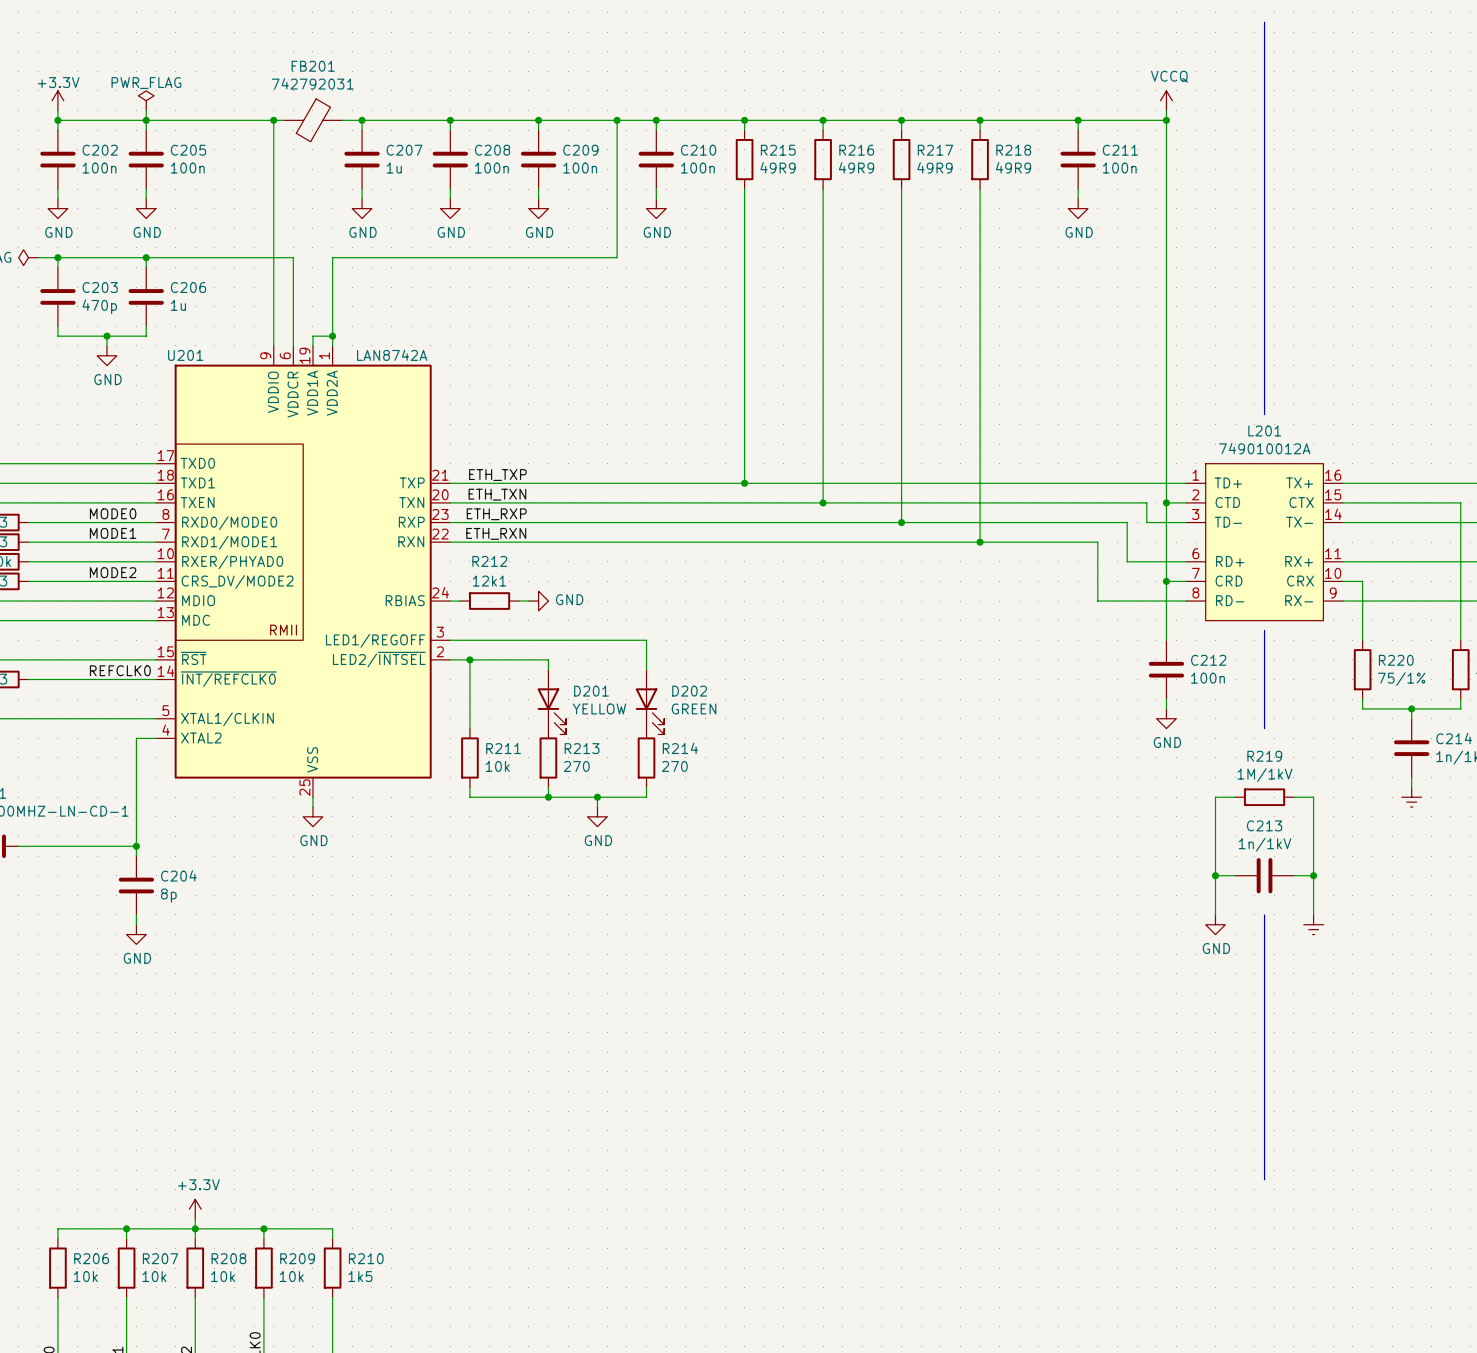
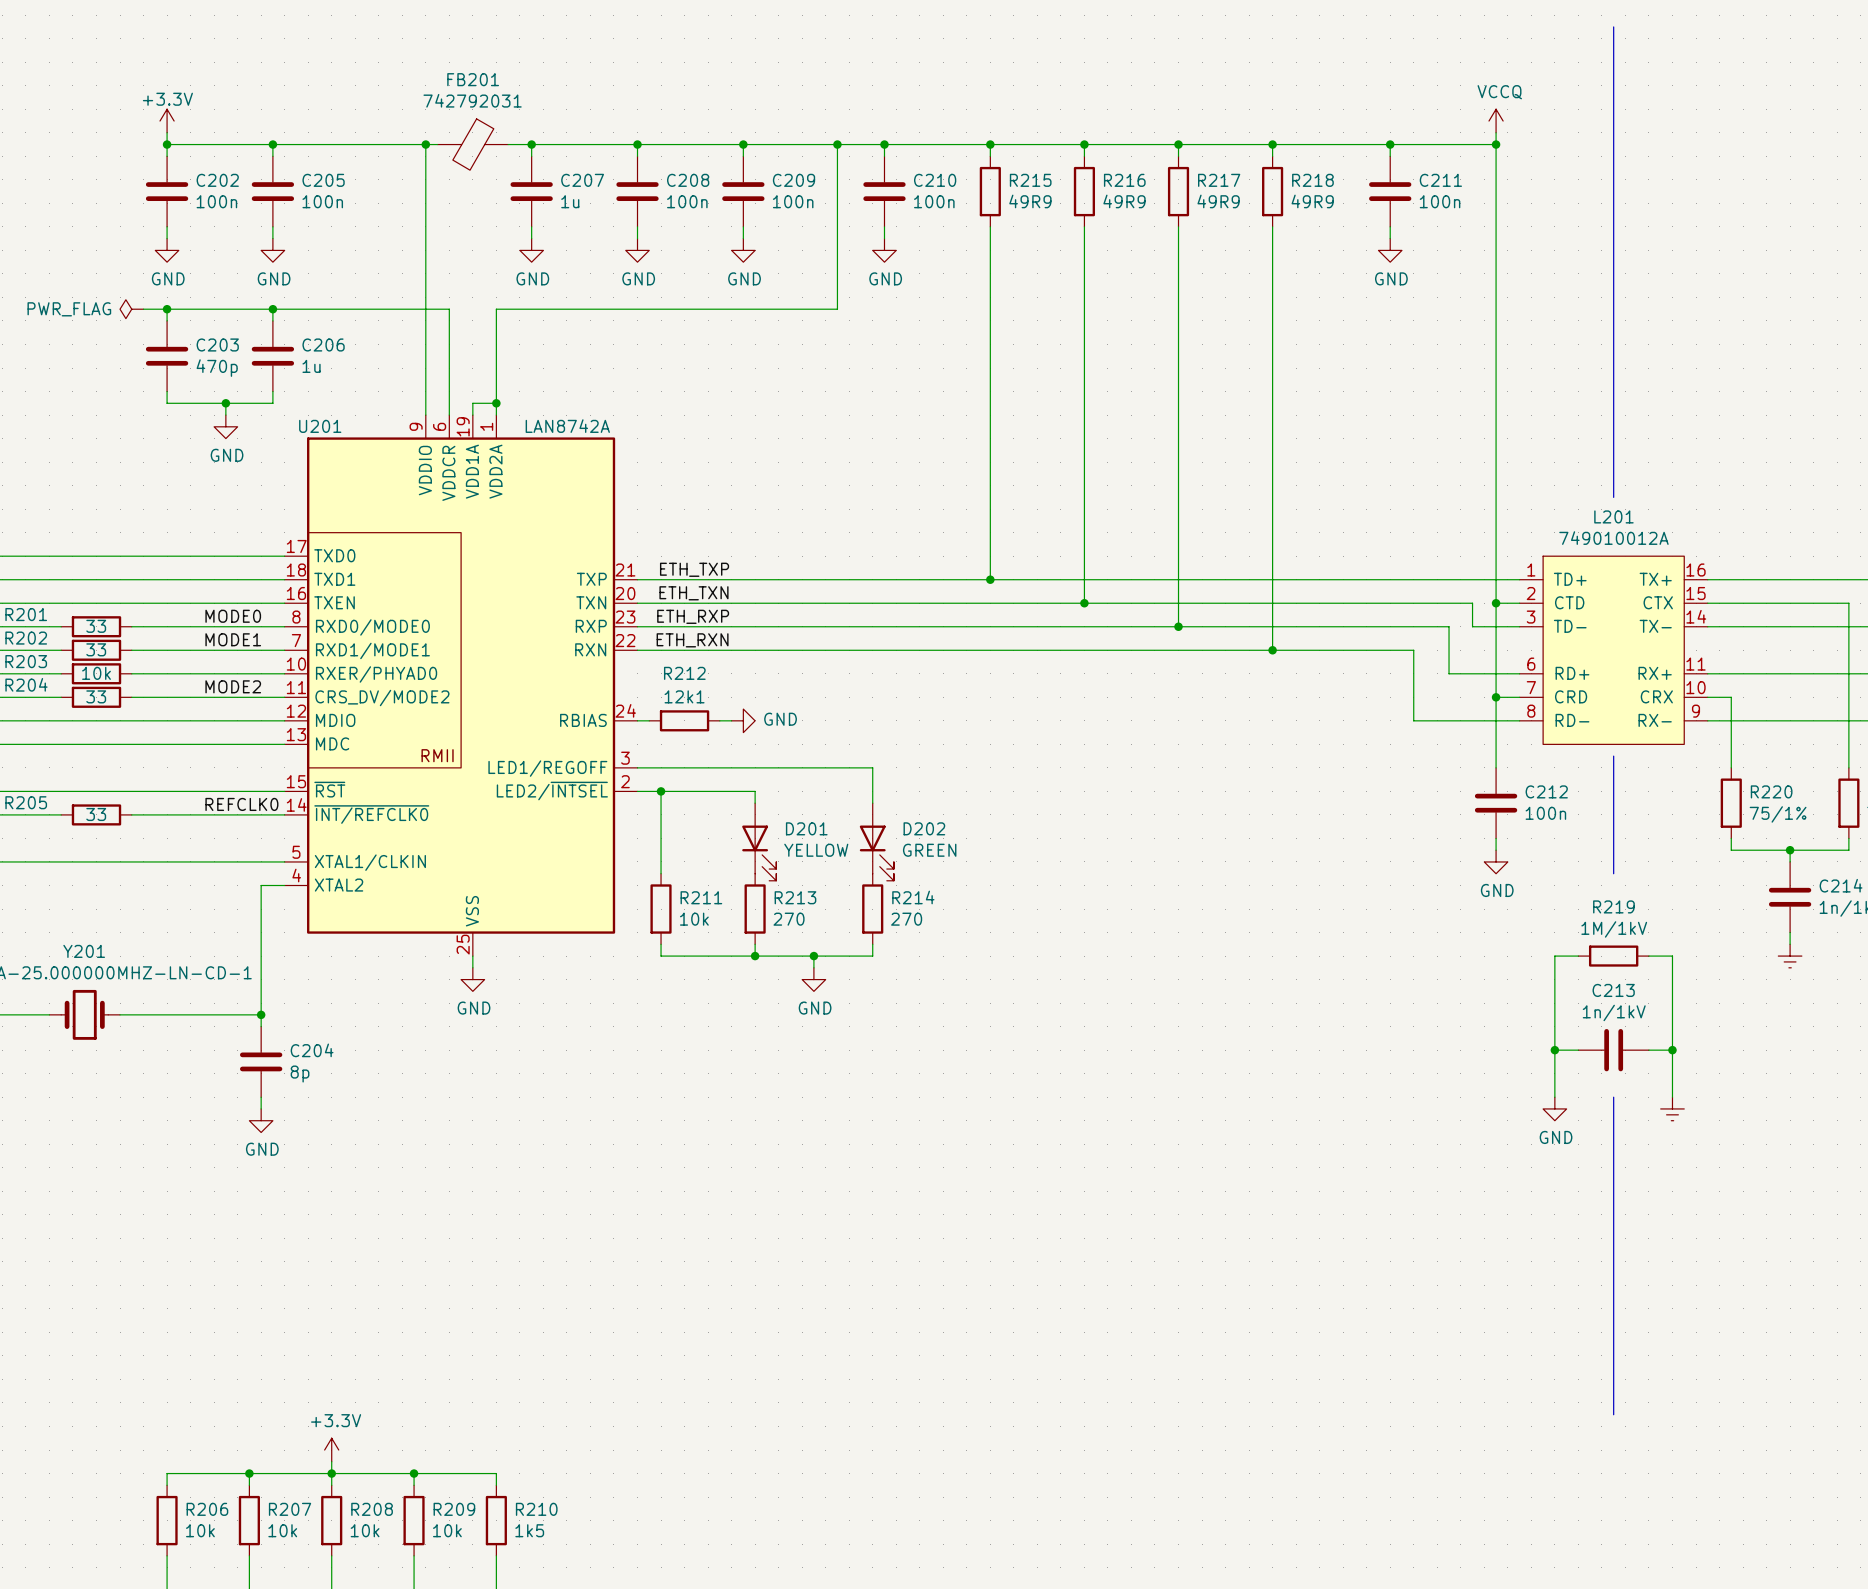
power symbol: PWR_FLAG (146, 100) -> none
wire: (146, 110) (146, 120) -> none

